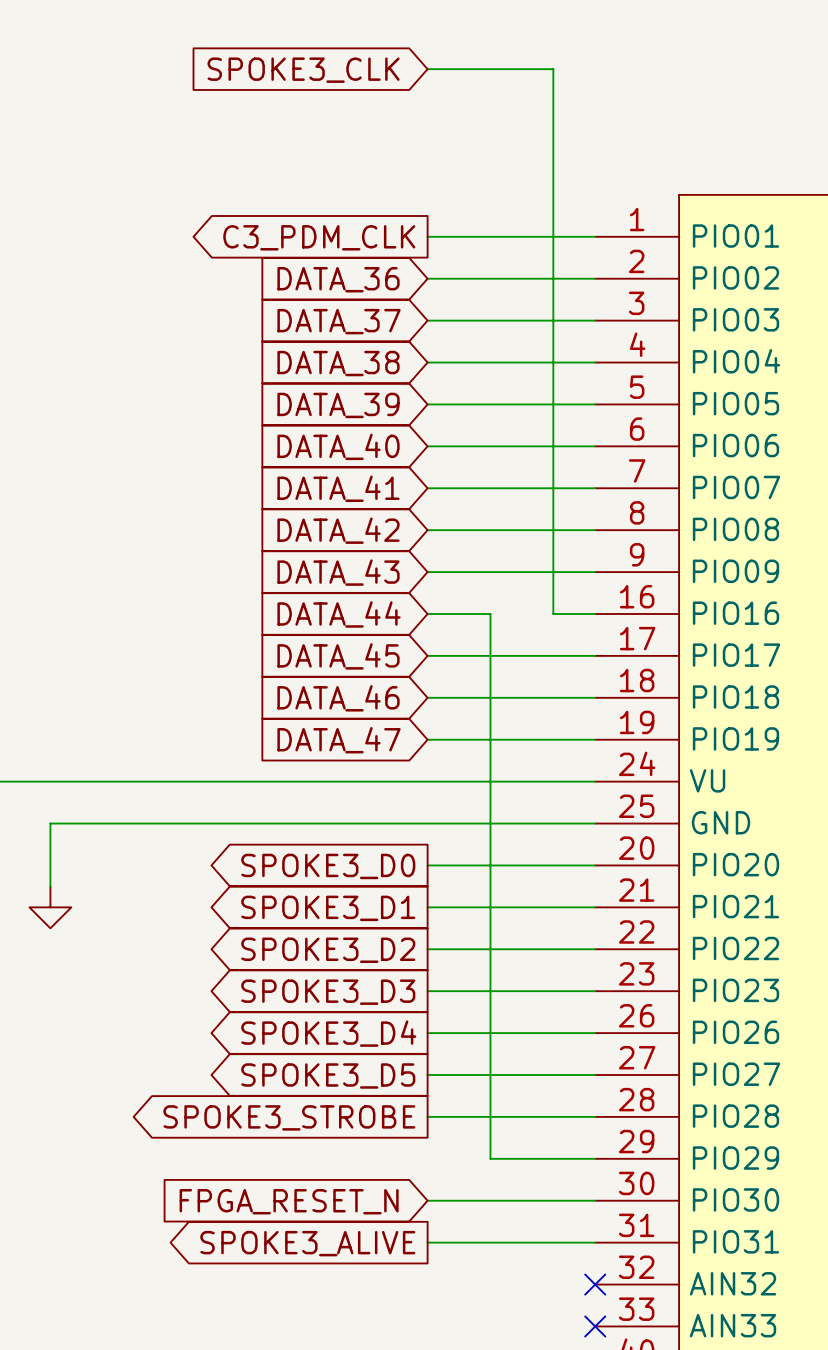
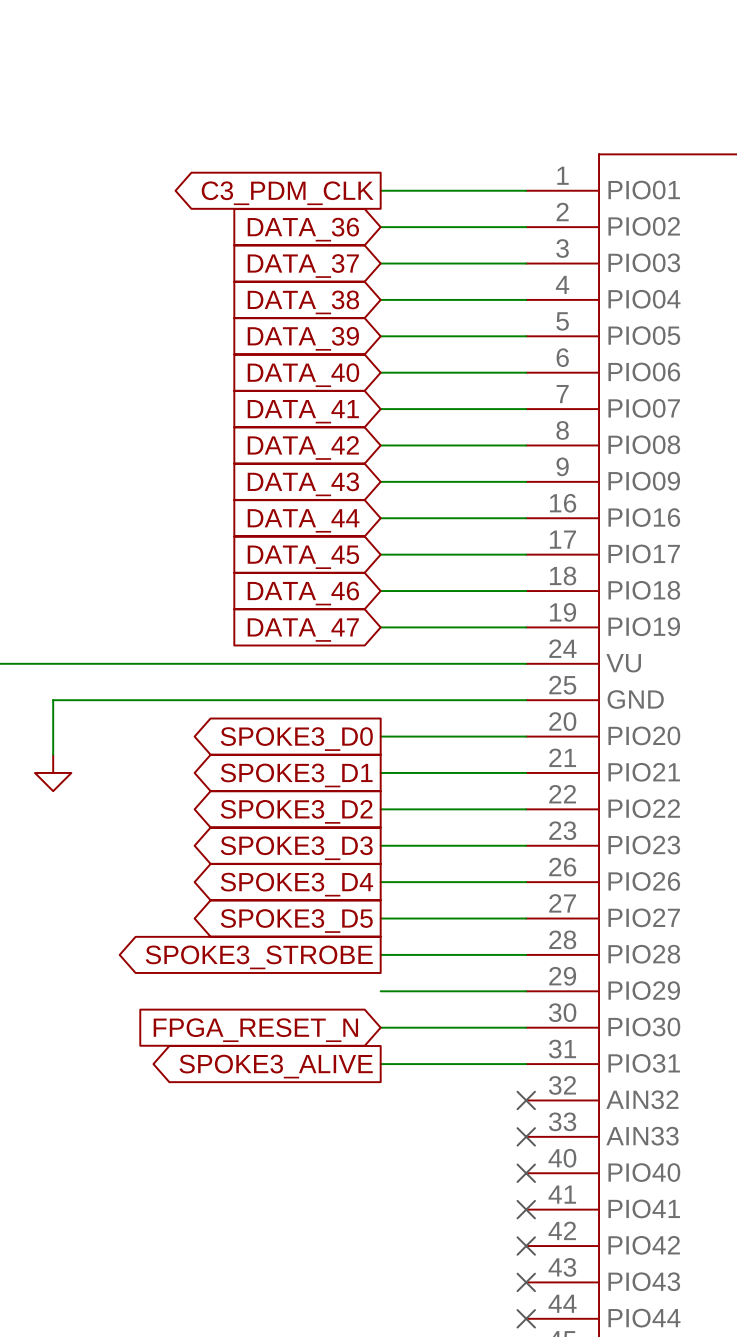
wire: (427, 69) (553, 69) (553, 613) -> (435, 518) (489, 518)
global label: SPOKE3_CLK (303, 70) -> none
wire: (490, 613) (490, 1158) -> (380, 991) (435, 991)

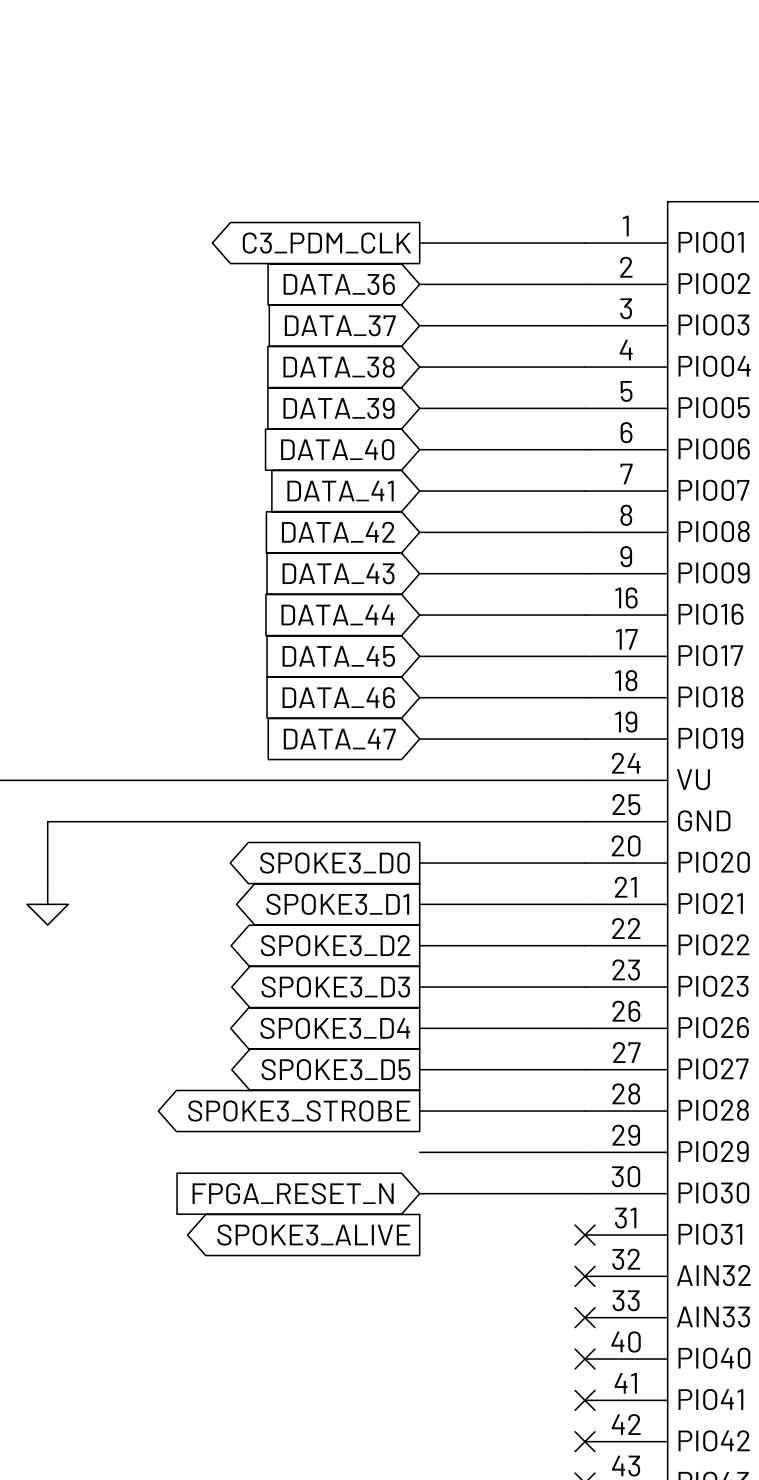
wire: (380, 1064) (526, 1064) -> none
no-connect mark: none -> (585, 1235)

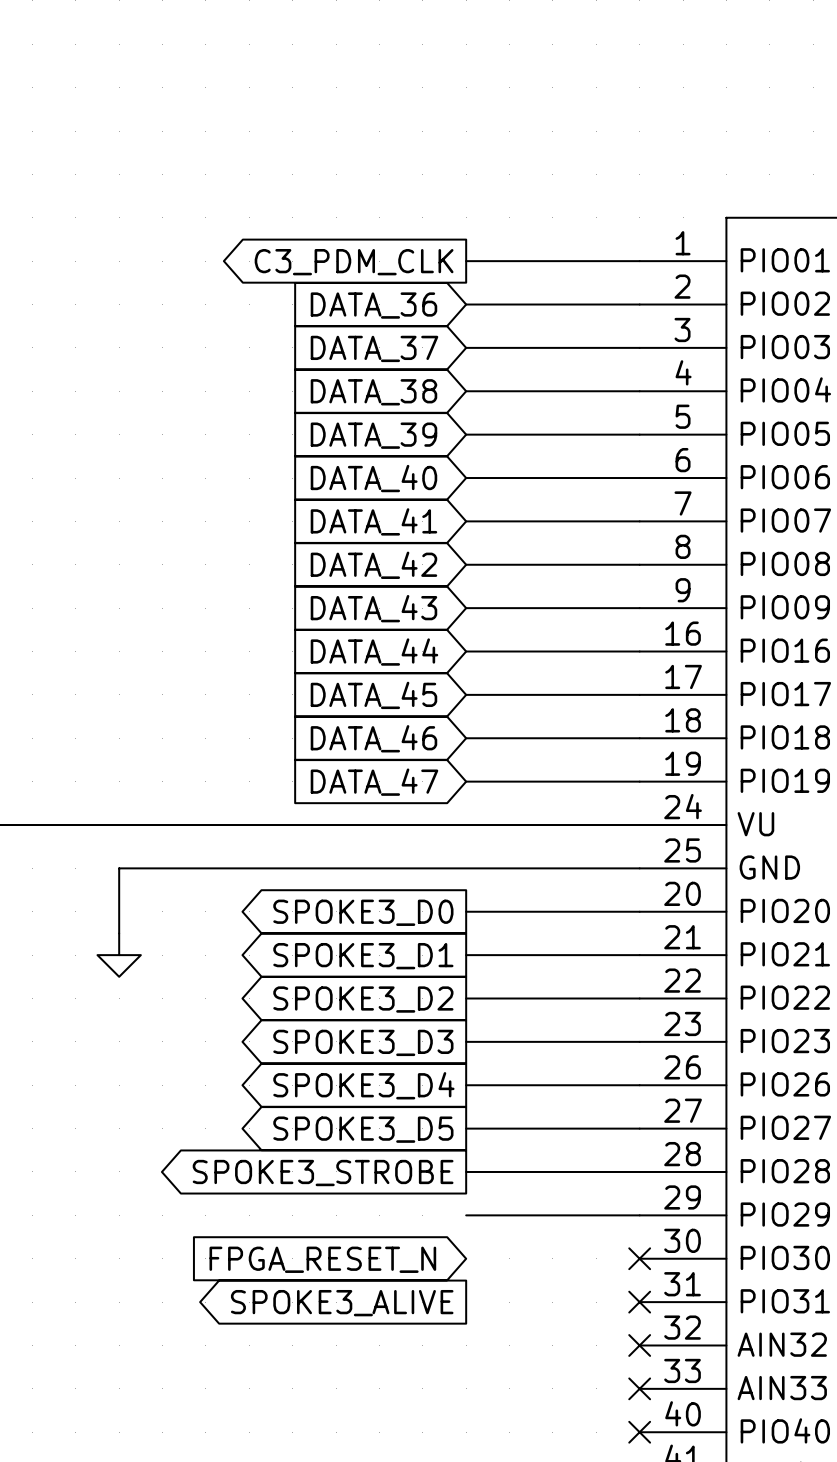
wire: (89, 821) (47, 821) (47, 883) -> (119, 868) (119, 933)
power symbol position: (47, 904) -> (119, 955)
wire: (419, 1193) (585, 1193) -> none
no-connect mark: none -> (639, 1258)

